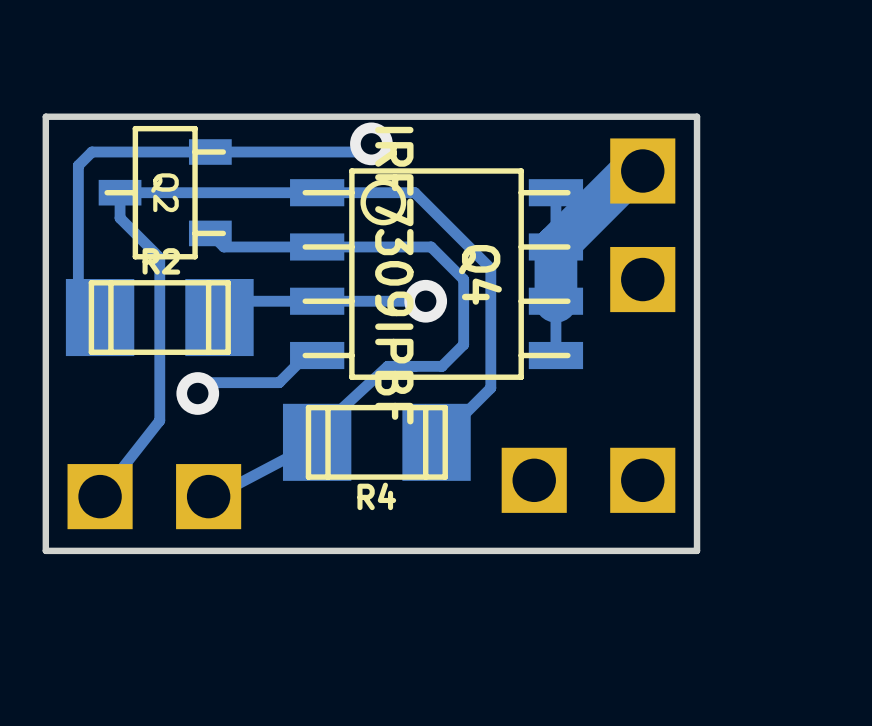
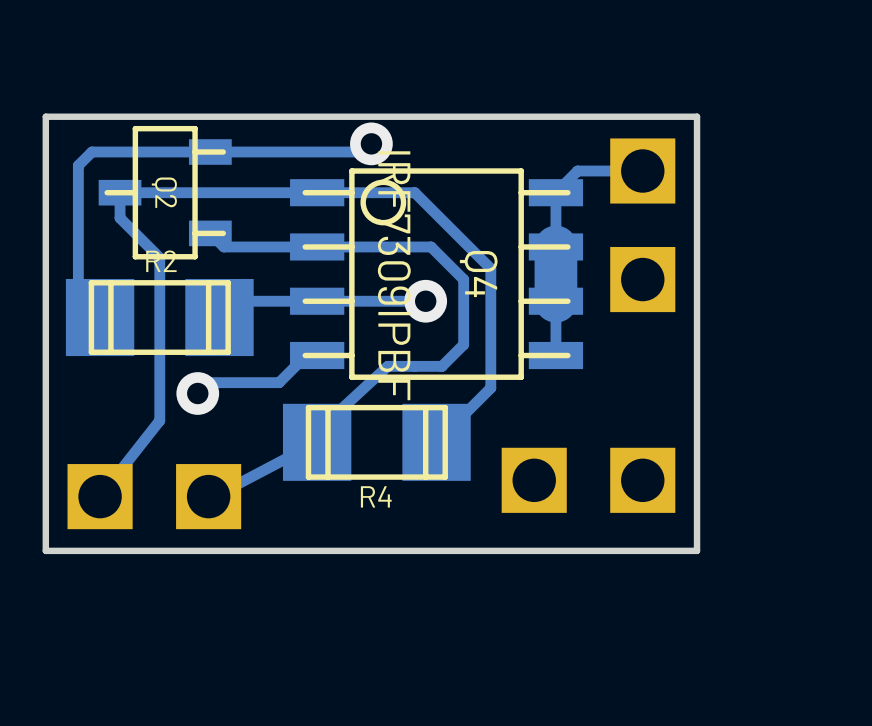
track: (631, 171) (555, 246) -> (631, 171) (577, 171) (555, 192)

